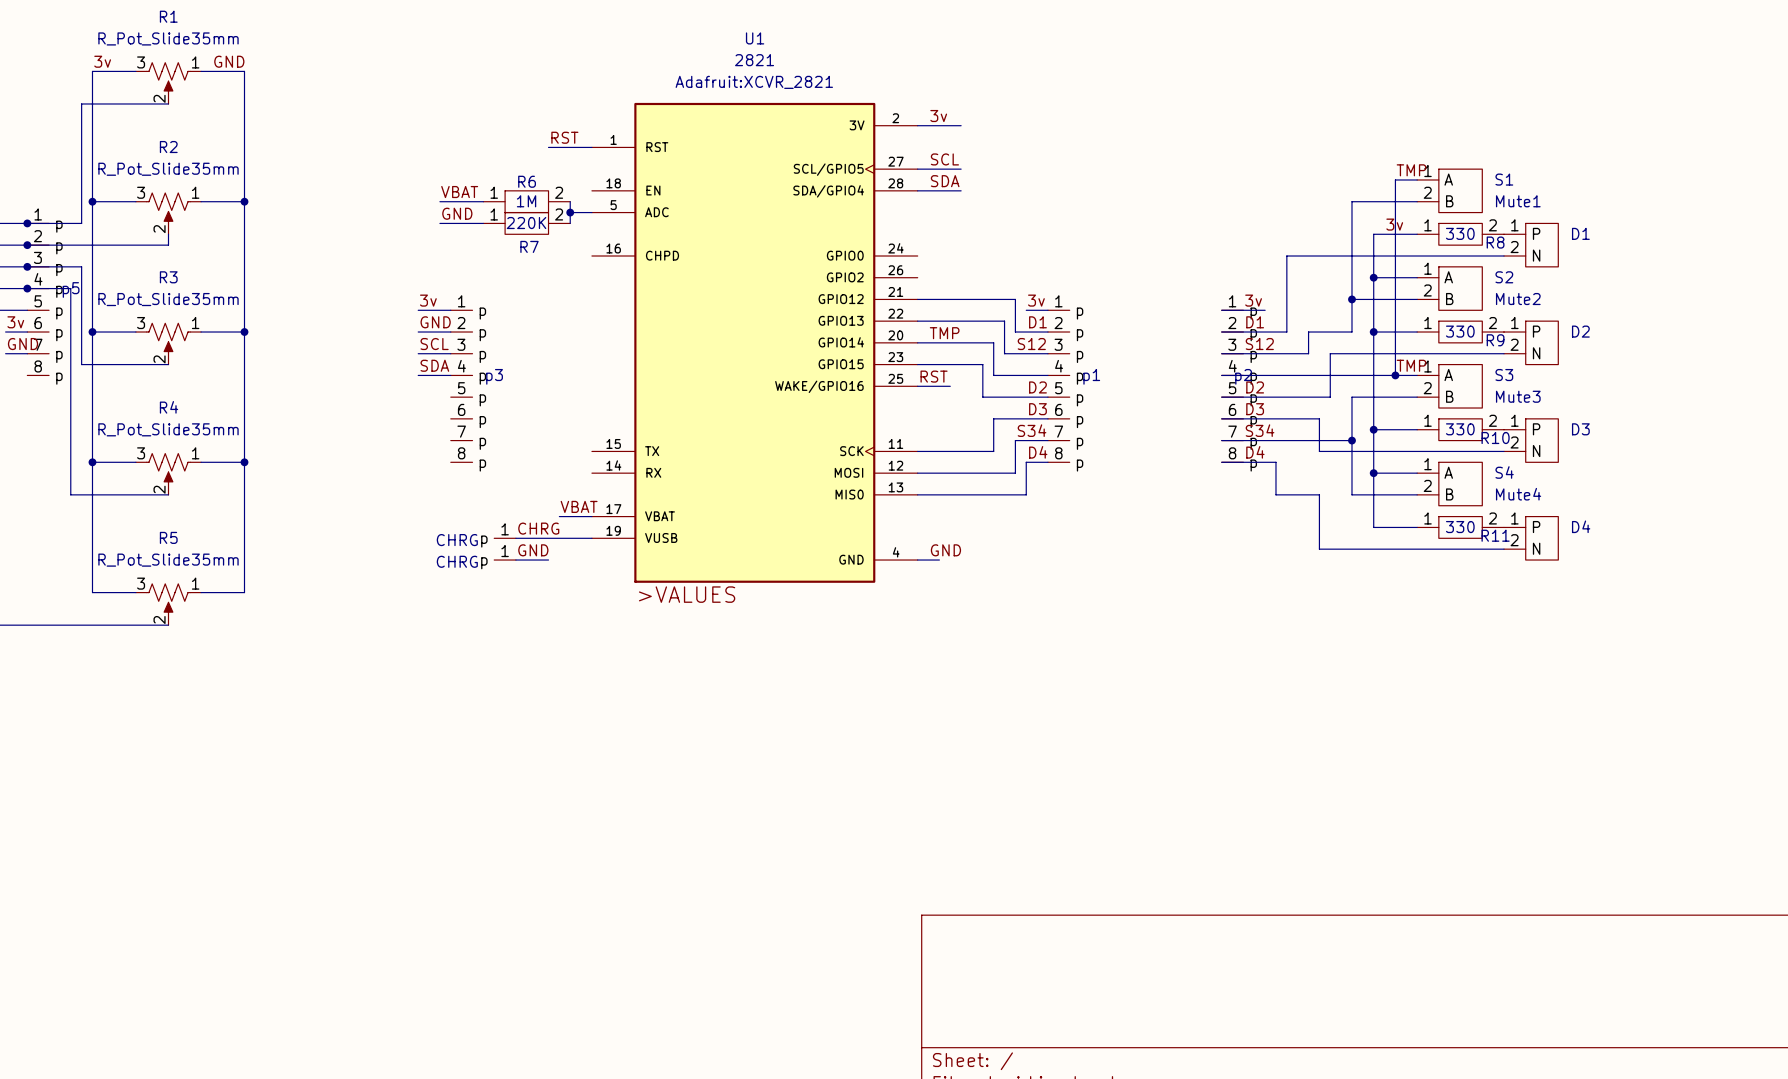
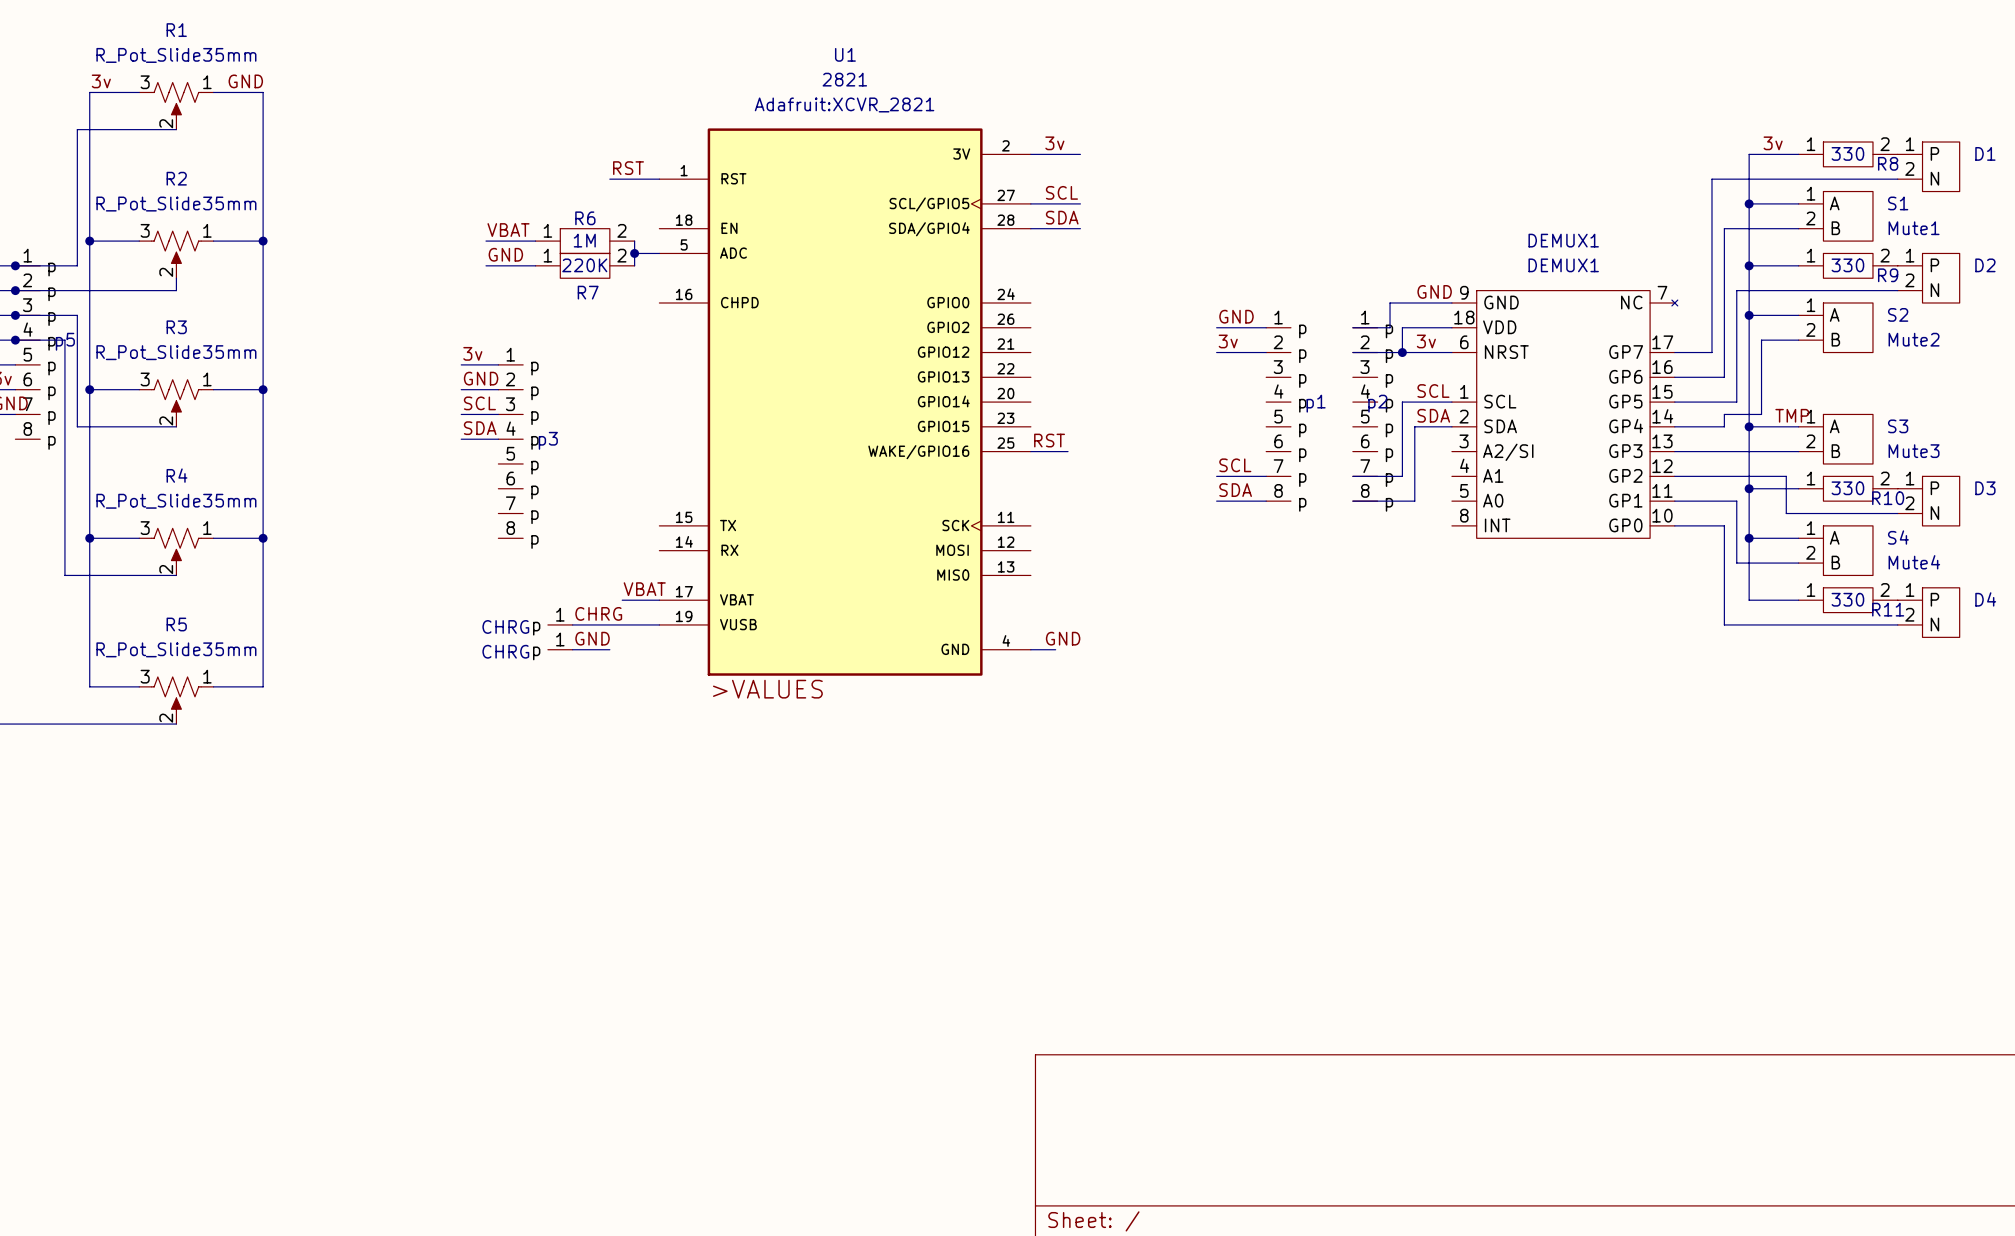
label: none -> 3v (1773, 143)
wire: none -> (1798, 154) (1749, 154) (1749, 600) (1798, 600)
wire: none -> (1897, 179) (1711, 179) (1711, 352) (1674, 352)
wire: none -> (1749, 203) (1798, 203)
junction: none -> (1749, 203)
label: TMP (1411, 170) -> none
wire: (1417, 179) (1395, 179) (1395, 375) -> none
S1 position: (1449, 190) -> (1835, 216)
wire: none -> (1798, 228) (1724, 228) (1724, 377) (1674, 377)
wire: (1417, 201) (1351, 201) (1351, 332) (1308, 332) (1308, 353) (1221, 353) -> none
junction: none -> (1749, 265)
label: 3v (1394, 224) -> none
wire: (1417, 234) (1373, 234) (1373, 527) (1417, 527) -> none
R8 position: (1460, 234) -> (1848, 154)
D1 position: (1531, 245) -> (1928, 166)
wire: none -> (1897, 290) (1736, 290) (1736, 402) (1674, 402)
label: none -> GND (1434, 291)
wire: none -> (1451, 302) (1390, 302) (1390, 327) (1352, 327)
wire: (1504, 256) (1286, 256) (1286, 332) (1221, 332) -> none
junction: none -> (1749, 315)
label: none -> GND (1236, 316)
wire: none -> (1216, 327) (1266, 327)
wire: none -> (1451, 327) (1402, 327) (1402, 352)
wire: (1373, 277) (1417, 277) -> (1749, 315) (1798, 315)
junction: (1373, 277) -> none
S2 position: (1449, 288) -> (1835, 327)
wire: none -> (1798, 340) (1761, 340) (1761, 414) (1724, 414) (1724, 426) (1674, 426)
wire: (917, 299) (1015, 299) (1015, 332) (1047, 332) -> none
wire: none -> (1352, 352) (1451, 352)
junction: none -> (1402, 352)
wire: (1351, 299) (1417, 299) -> none
junction: (1351, 299) -> none
label position: 3v (1036, 300) -> 3v (1228, 341)
label position: 3v (1253, 300) -> 3v (1426, 341)
wire: (1026, 310) (1047, 310) -> none
wire: (1221, 310) (1265, 310) -> (1216, 352) (1266, 352)
wire: (917, 321) (1004, 321) (1004, 353) (1047, 353) -> none
label: D1 (1037, 322) -> none
label: D1 (1255, 322) -> none
wire: (1373, 332) (1417, 332) -> (1749, 265) (1798, 265)
junction: (1373, 332) -> none
R9 position: (1460, 332) -> (1848, 265)
label: TMP (944, 333) -> none
label: none -> SCL (1433, 391)
wire: (917, 342) (993, 342) (993, 375) (1047, 375) -> none
wire: none -> (1451, 402) (1402, 402) (1402, 476) (1352, 476)
D2 position: (1531, 342) -> (1928, 278)
label: S12 (1031, 344) -> none
label: S12 (1259, 344) -> none
DEMUX1: none -> DEMUX1 (1564, 414)
wire: (1504, 353) (1330, 353) (1330, 397) (1221, 397) -> none
label: none -> SDA (1433, 415)
label: none -> TMP (1792, 415)
wire: (917, 364) (982, 364) (982, 397) (1047, 397) -> none
wire: none -> (1451, 426) (1414, 426) (1414, 501) (1352, 501)
wire: none -> (1749, 426) (1798, 426)
junction: none -> (1749, 426)
label: TMP (1411, 365) -> none
wire: (1221, 375) (1417, 375) -> none
junction: (1395, 375) -> none
p1 position: (1058, 386) -> (1278, 414)
p2 position: (1232, 386) -> (1365, 414)
S3 position: (1449, 386) -> (1835, 439)
wire: none -> (1674, 451) (1798, 451)
label: D2 (1037, 387) -> none
label: D2 (1255, 387) -> none
wire: (1417, 397) (1351, 397) (1351, 494) (1417, 494) -> none
label: none -> SCL (1235, 465)
wire: none -> (1216, 476) (1266, 476)
wire: none -> (1674, 476) (1786, 476) (1786, 513) (1897, 513)
label: D3 (1037, 409) -> none
label: D3 (1255, 409) -> none
wire: (1047, 418) (993, 418) (993, 451) (917, 451) -> none
wire: (1221, 418) (1319, 418) (1319, 451) (1482, 451) -> none
junction: none -> (1749, 488)
label: none -> SDA (1235, 490)
wire: none -> (1216, 501) (1266, 501)
wire: (1373, 429) (1417, 429) -> (1749, 488) (1798, 488)
junction: (1373, 429) -> none
R10 position: (1460, 429) -> (1848, 488)
wire: none -> (1674, 501) (1736, 501) (1736, 563) (1798, 563)
label: S34 (1032, 430) -> none
label: S34 (1260, 430) -> none
wire: (1047, 440) (1015, 440) (1015, 473) (917, 473) -> none
wire: (1221, 440) (1351, 440) -> none
junction: (1351, 440) -> none
D3 position: (1531, 440) -> (1928, 501)
wire: none -> (1699, 525) (1724, 525) (1724, 624) (1897, 624)
label: D4 (1038, 452) -> none
label: D4 (1255, 452) -> none
wire: (1047, 462) (1026, 462) (1026, 494) (917, 494) -> none
wire: (1221, 462) (1275, 462) (1275, 494) (1319, 494) (1319, 549) (1504, 549) -> none
junction: none -> (1749, 538)
wire: (1373, 473) (1417, 473) -> (1749, 538) (1798, 538)
junction: (1373, 473) -> none
S4 position: (1449, 484) -> (1835, 550)
R11 position: (1460, 527) -> (1848, 600)
D4 position: (1531, 538) -> (1928, 612)

